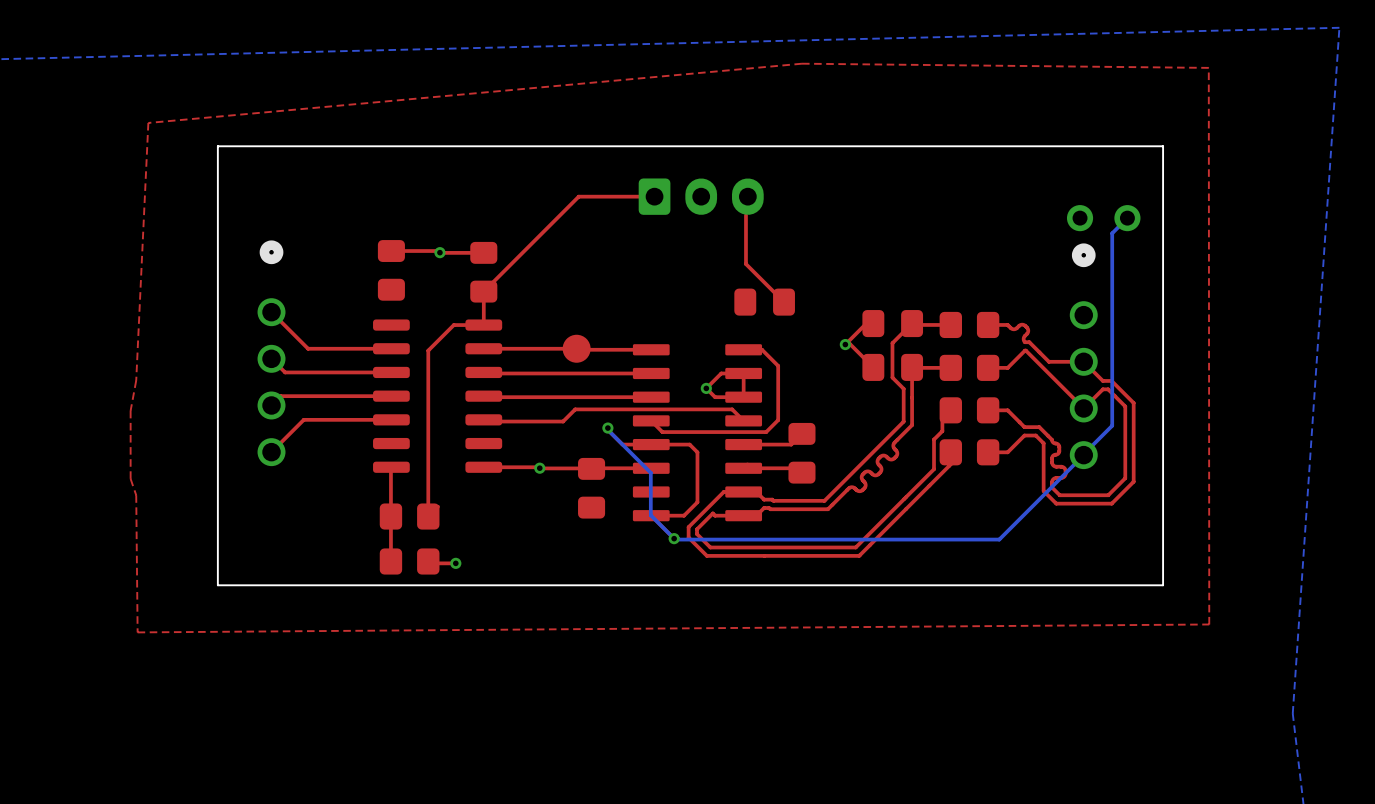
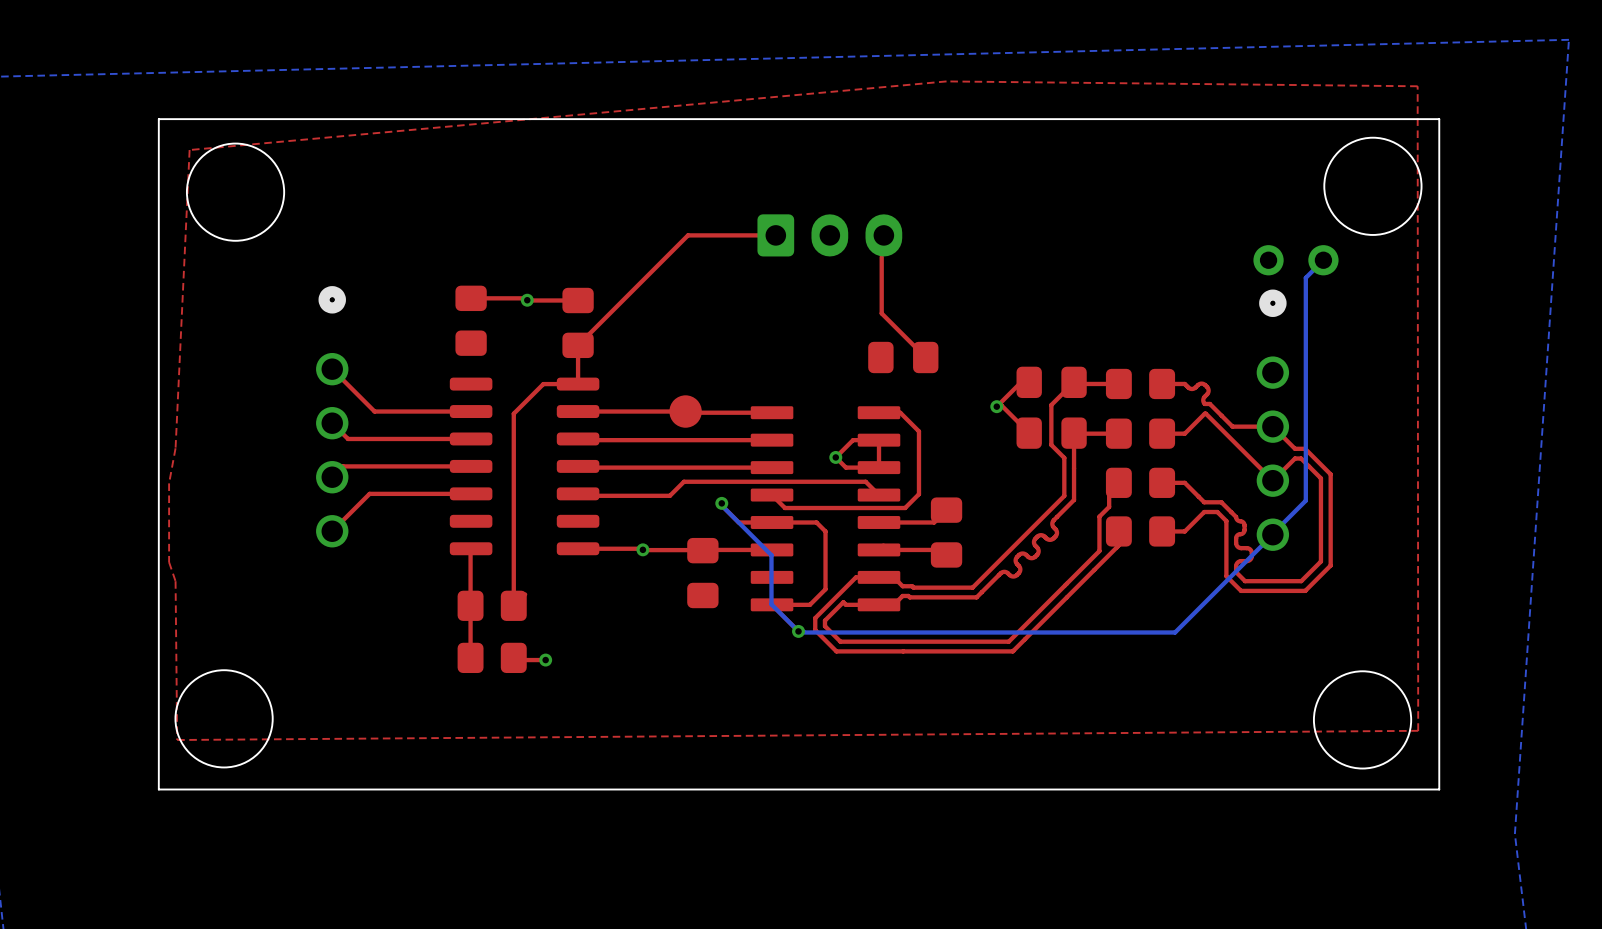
round board edge: none -> [1323, 137, 1423, 236]
round board edge: none -> [186, 143, 285, 242]
board edge: (1163, 146) (217, 146) (217, 585) (1163, 585) (1163, 146) -> (1439, 119) (1439, 789) (158, 789) (158, 119) (1439, 119)
round board edge: none -> [174, 669, 274, 769]
round board edge: none -> [1313, 670, 1412, 770]

